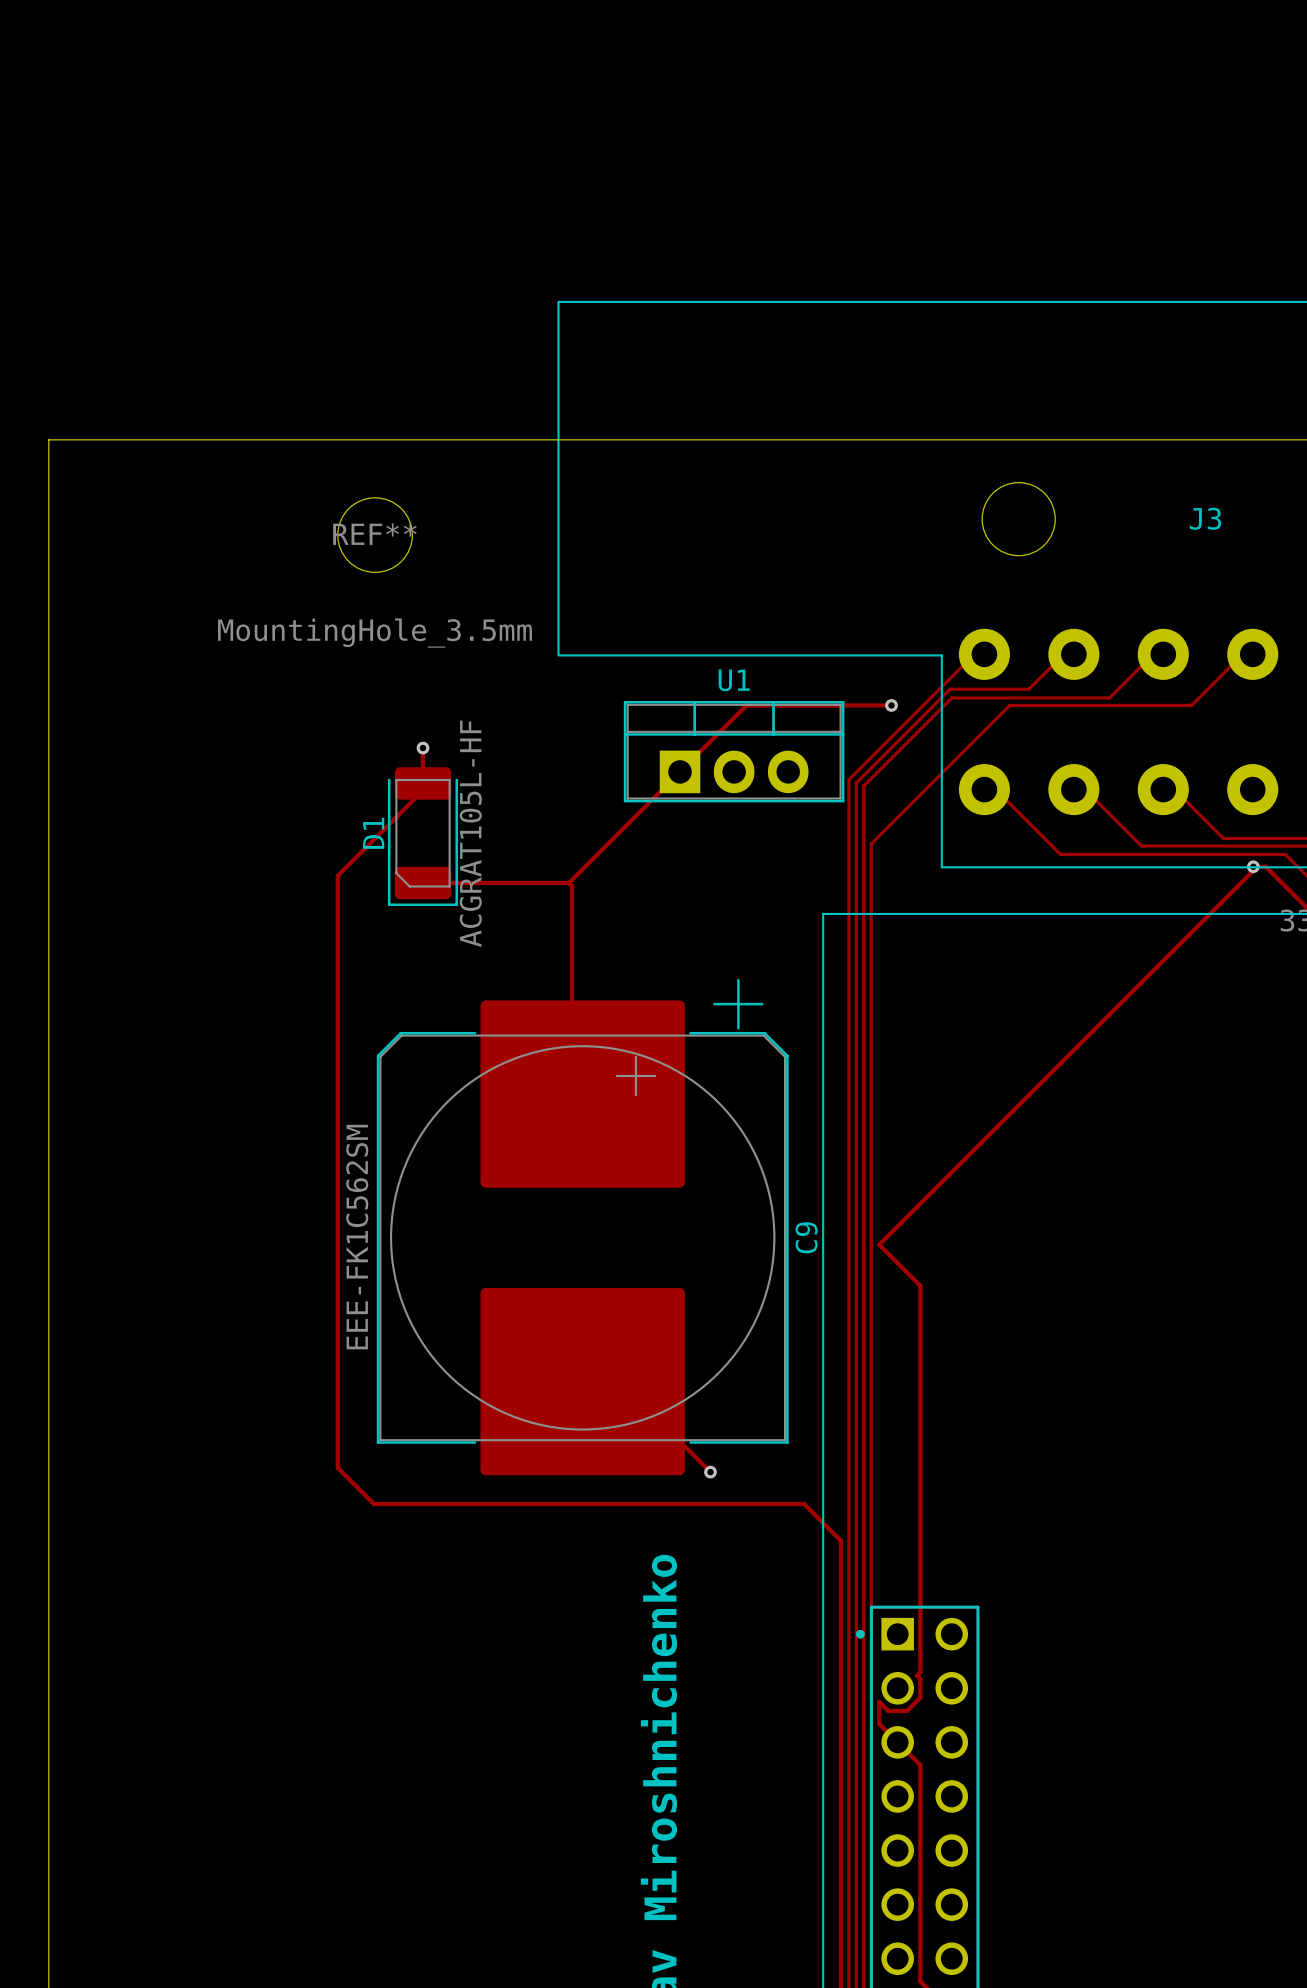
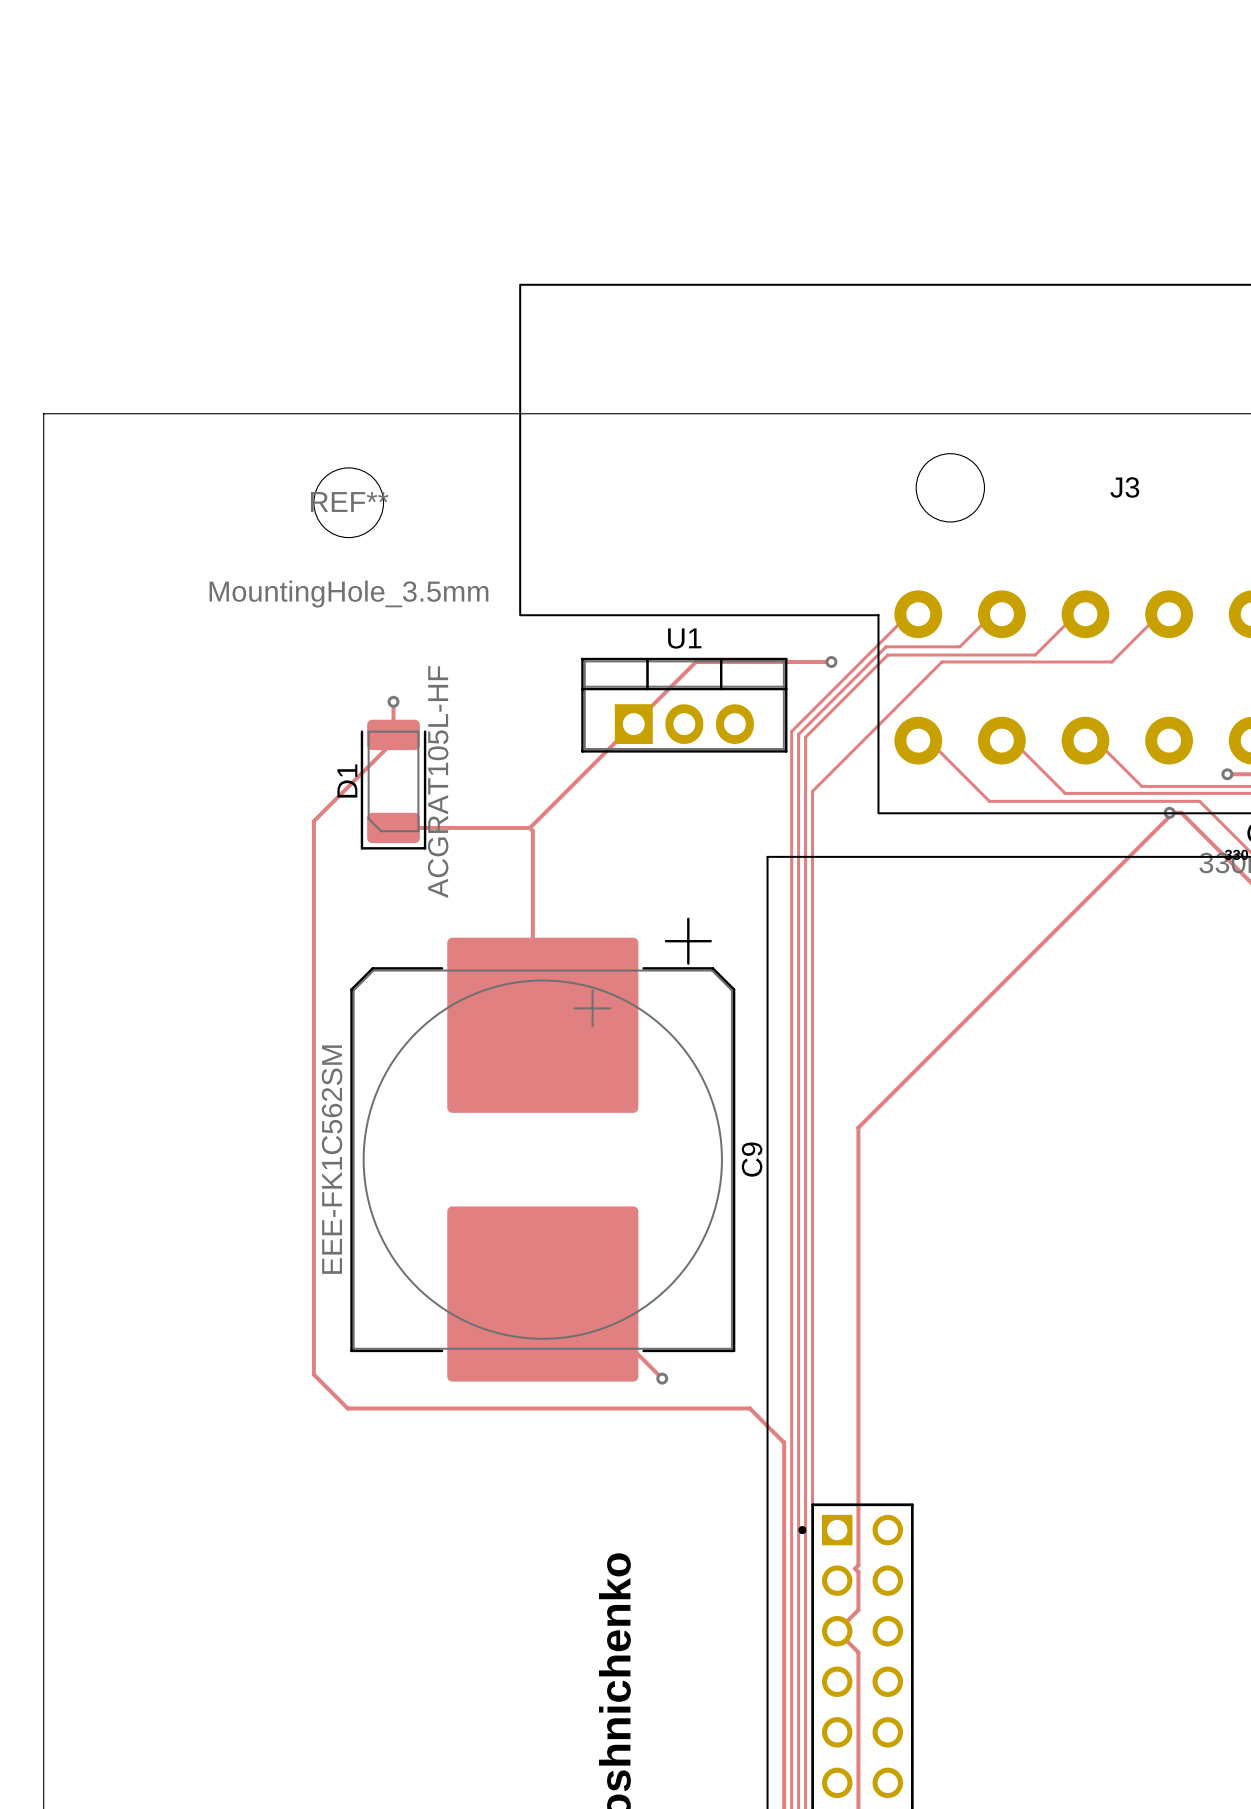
track: (920, 1203) (879, 1244) (920, 1285) -> (858, 1127) (858, 1204)
track: (920, 1697) (907, 1710) (888, 1710) (879, 1701) (879, 1723) (897, 1742) -> (858, 1589) (858, 1610) (837, 1631)

